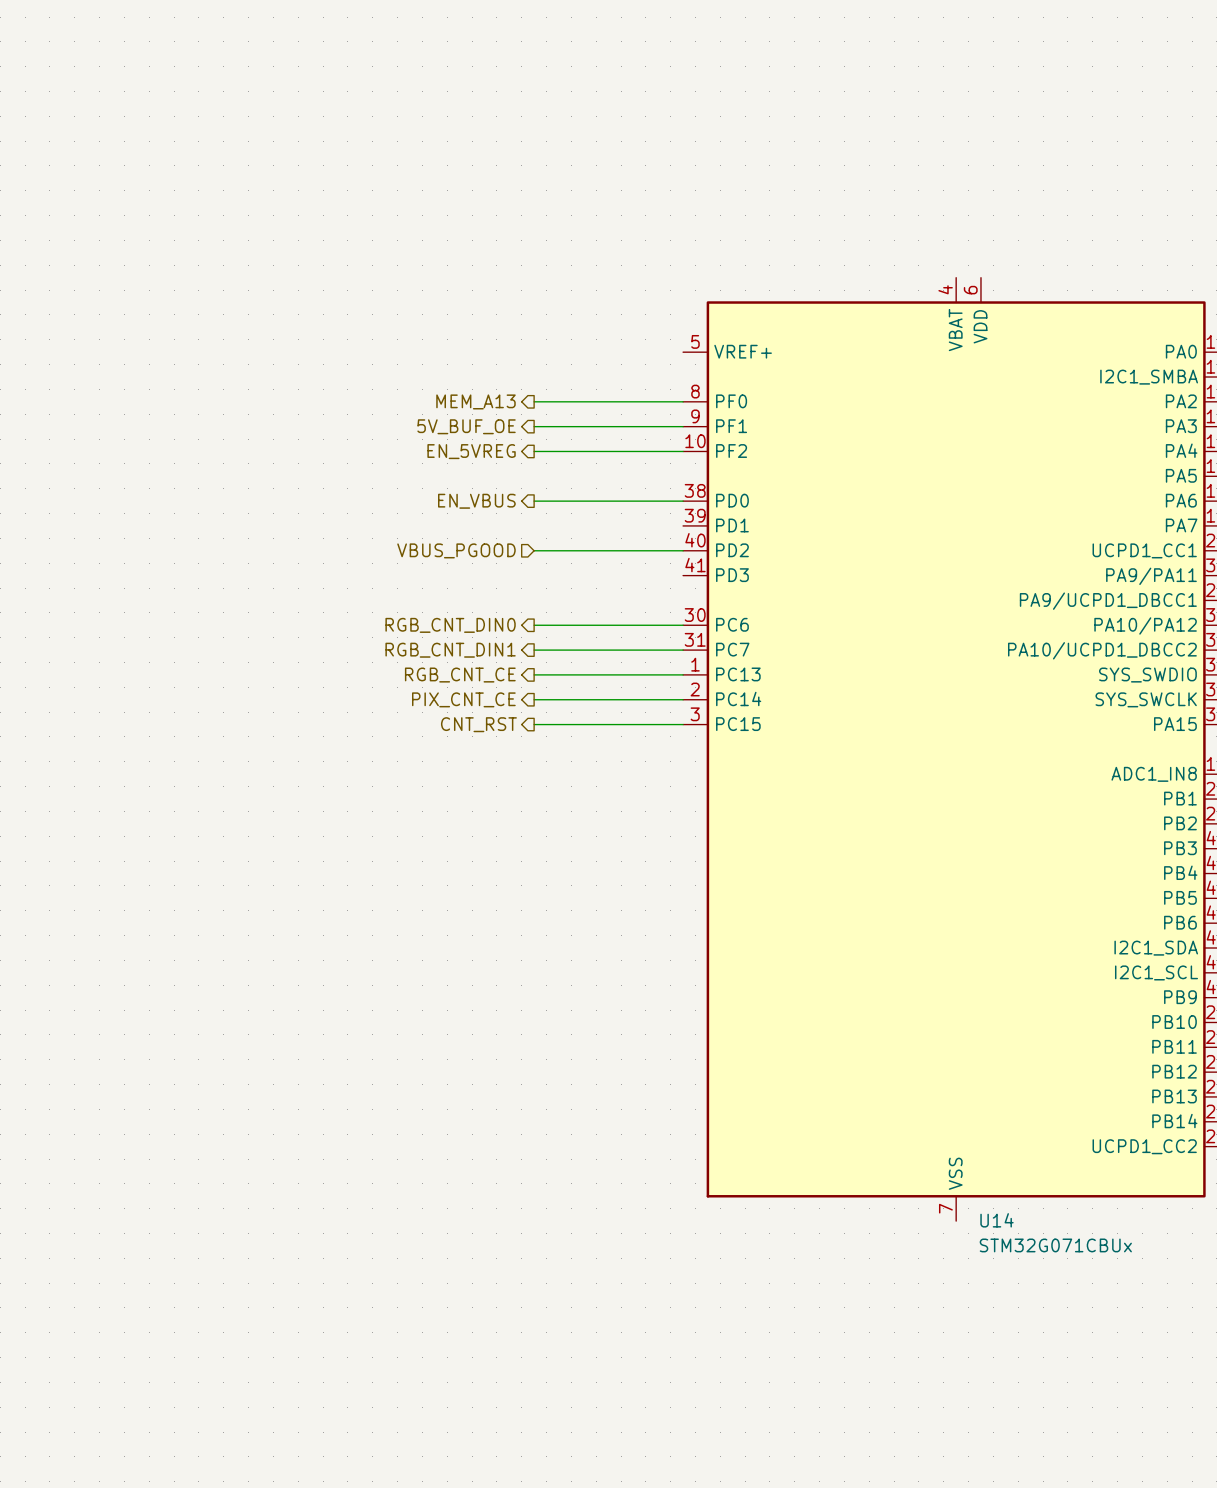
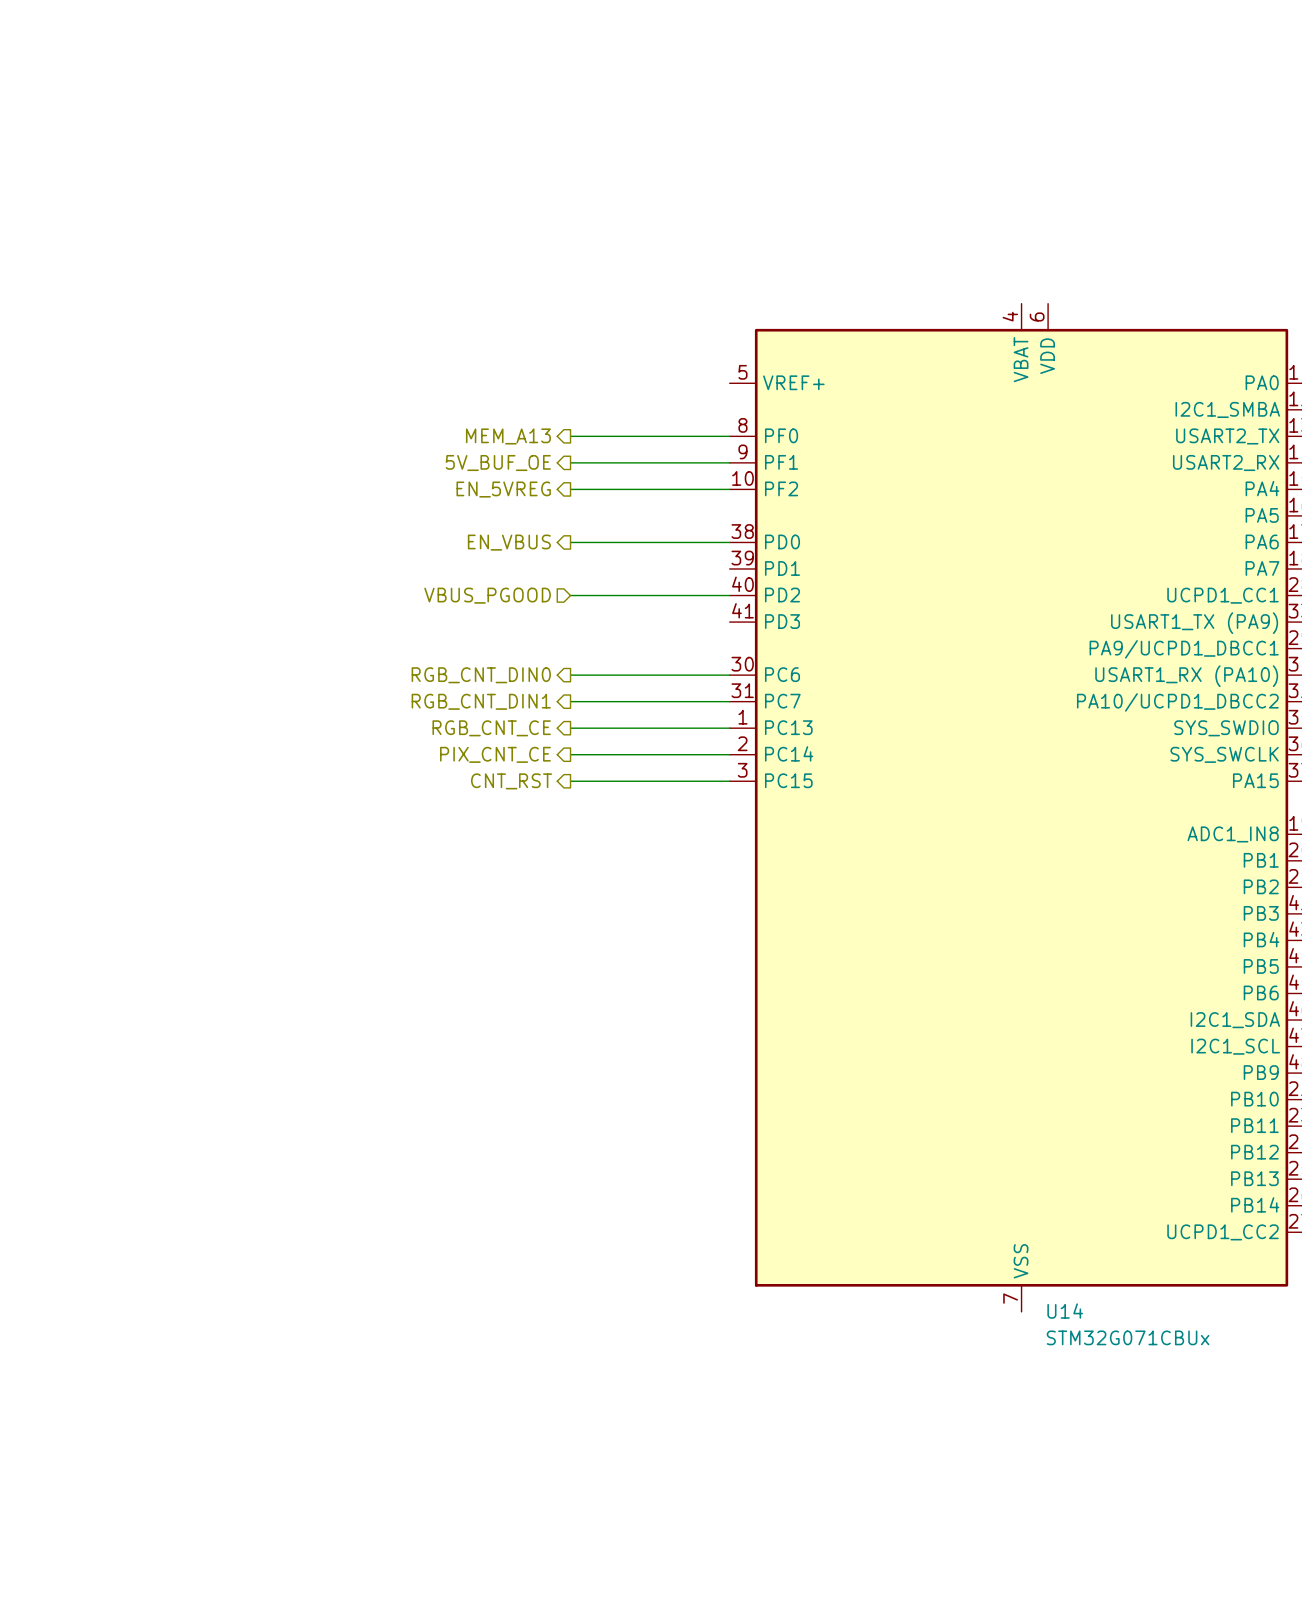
U14 pin name: PA2 (1181, 401) -> USART2_TX (1227, 436)
U14 pin name: PA3 (1181, 426) -> USART2_RX (1226, 463)
U14 pin name: PA9/PA11 (1151, 576) -> USART1_TX (PA9) (1194, 623)
U14 pin name: PA10/PA12 (1145, 625) -> USART1_RX (PA10) (1186, 676)

